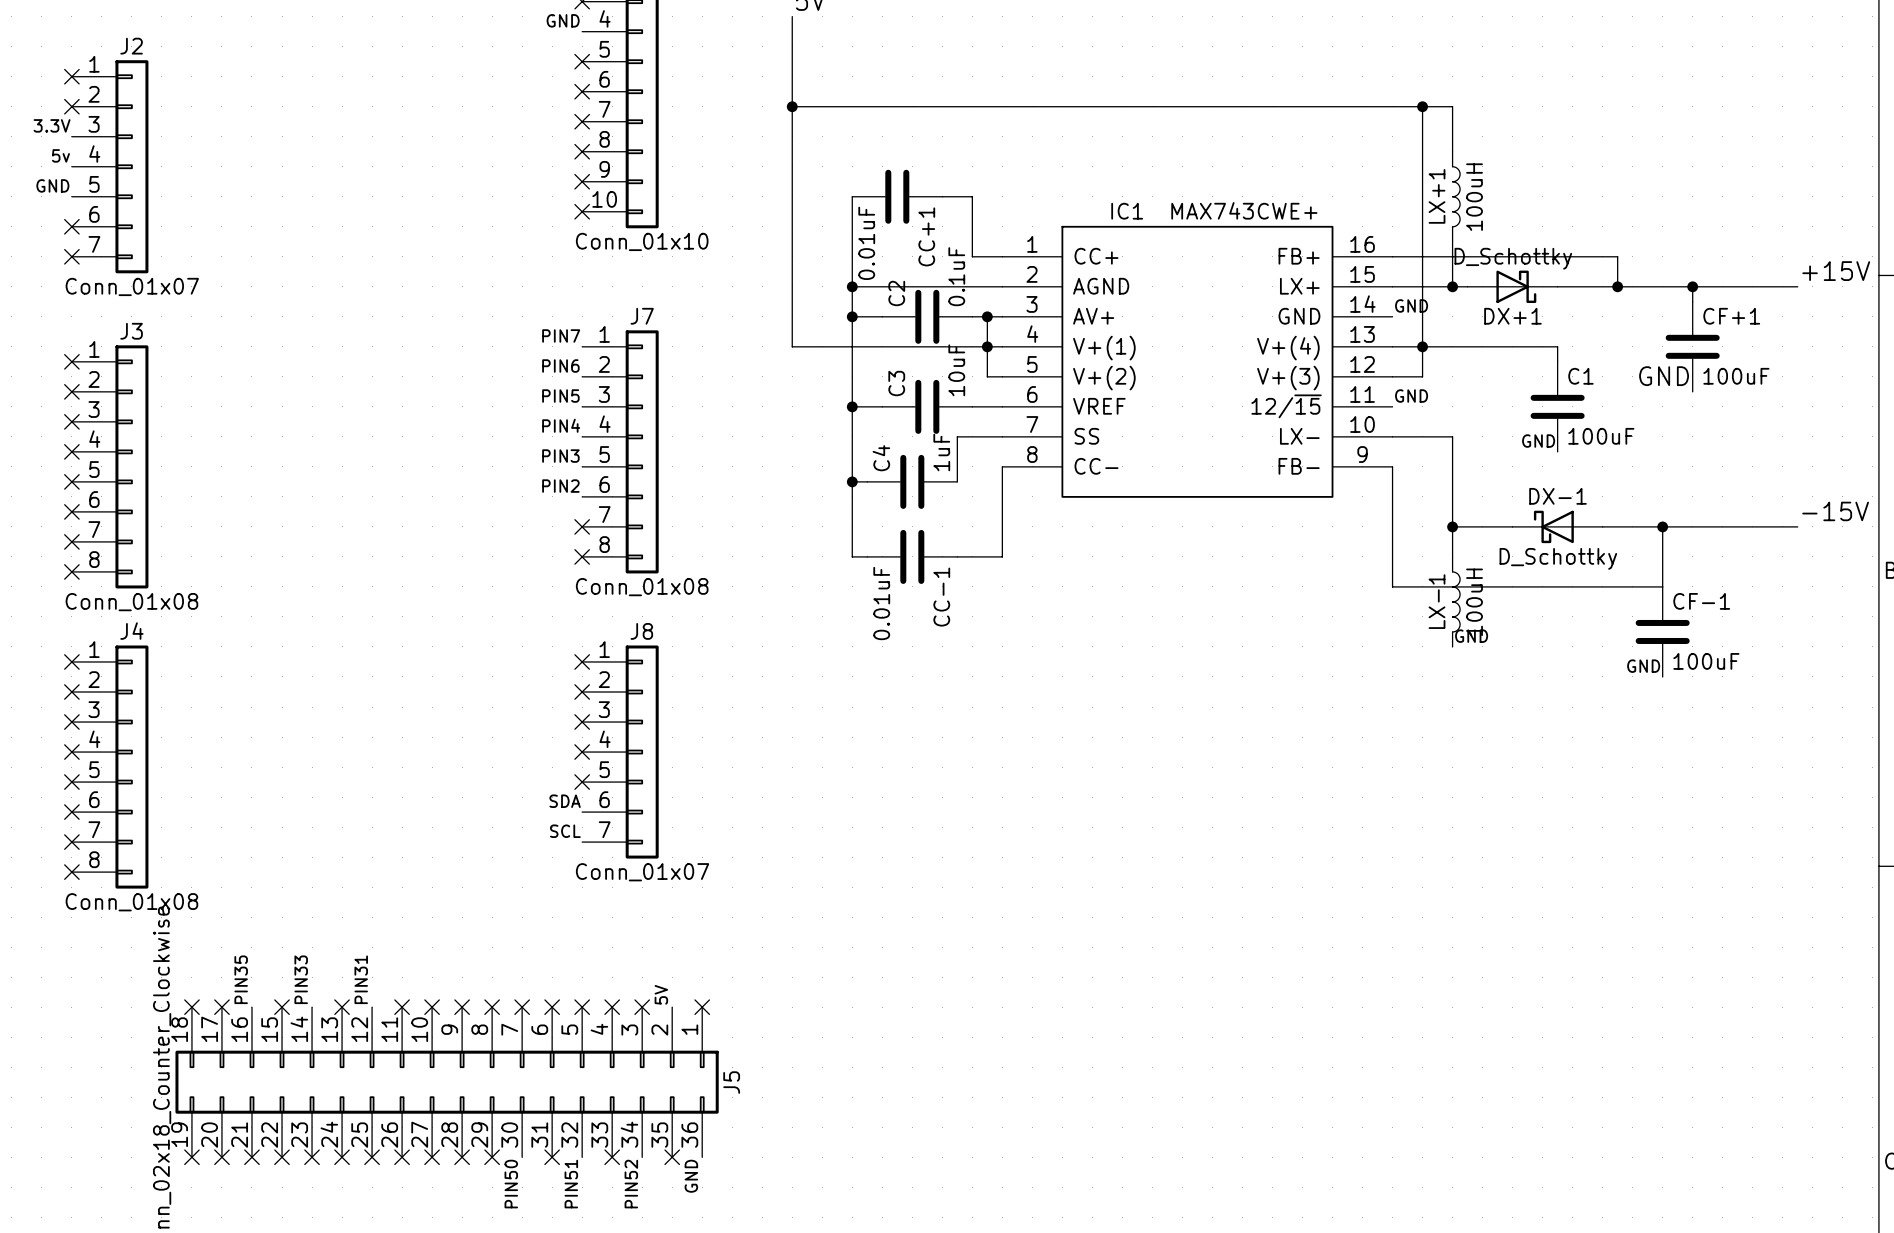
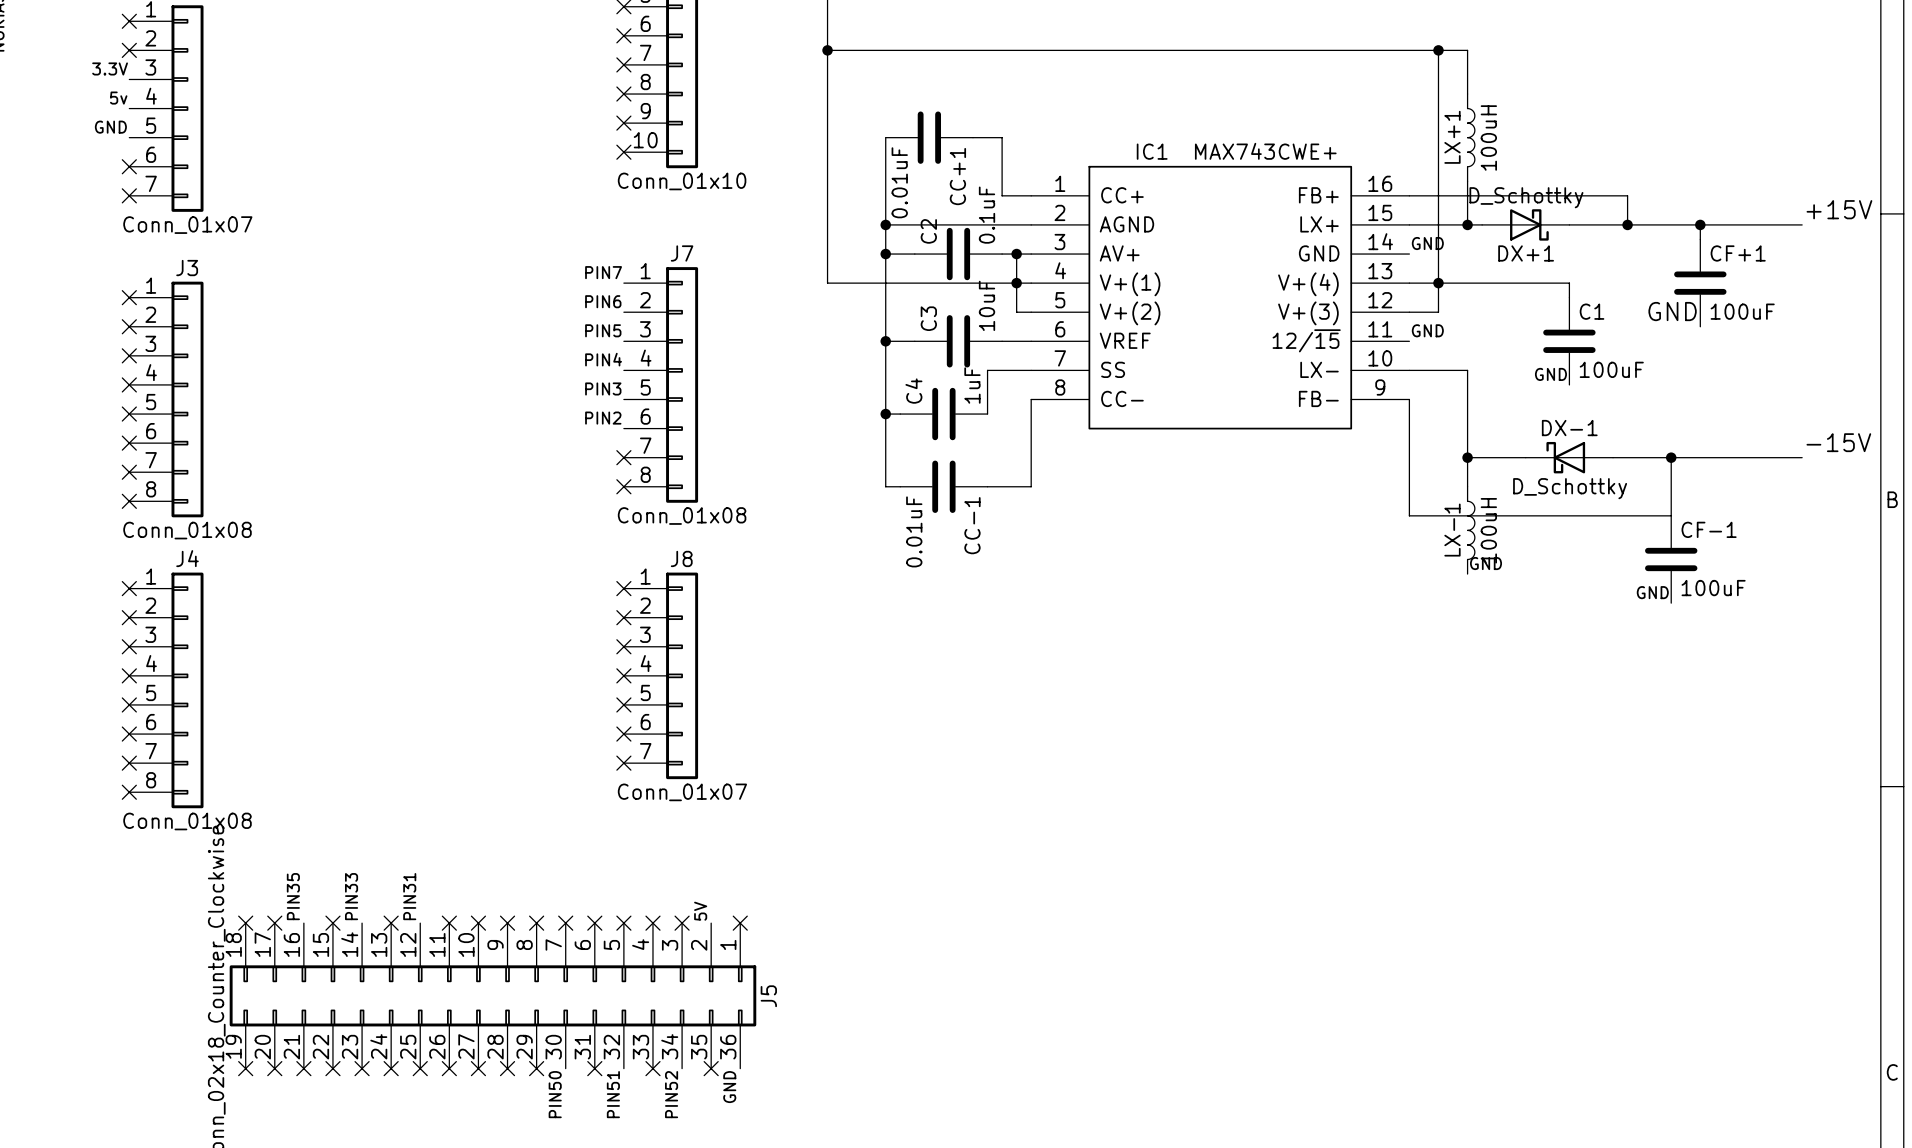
label: SDA (565, 801) -> none
no-connect mark: none -> (623, 734)
label: SCL (565, 831) -> none
no-connect mark: none -> (623, 763)

